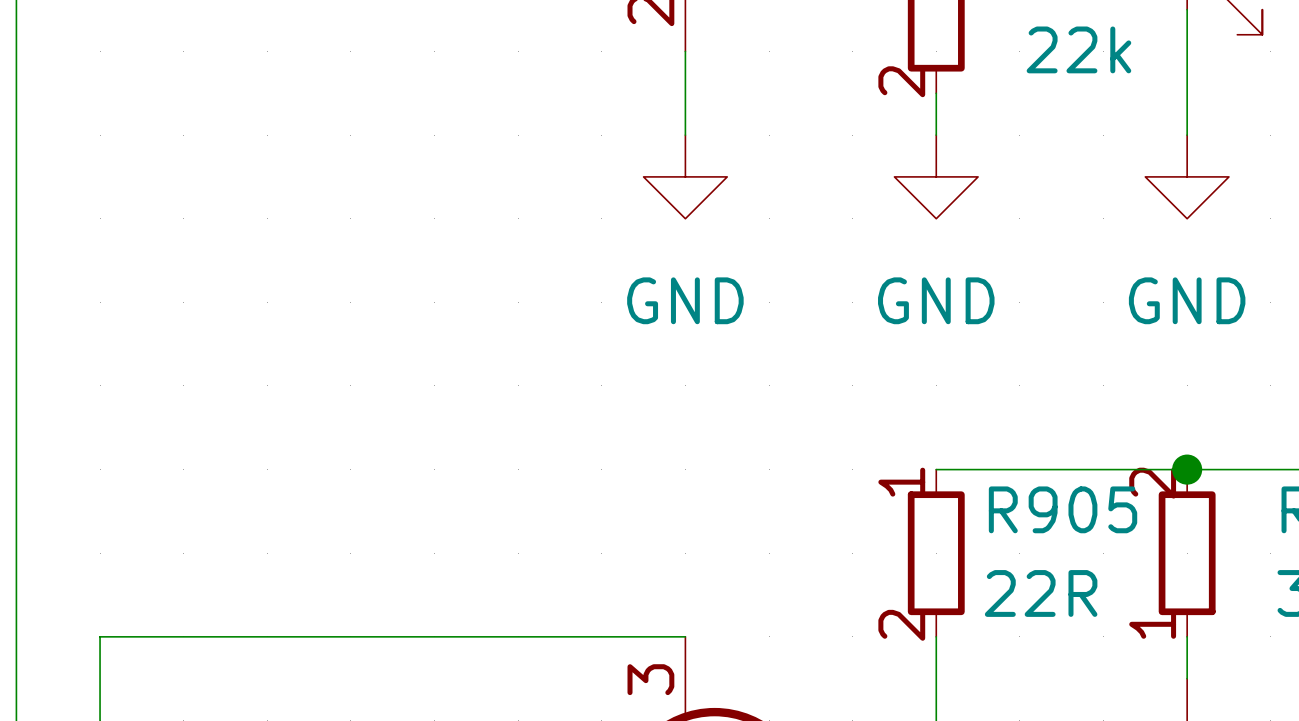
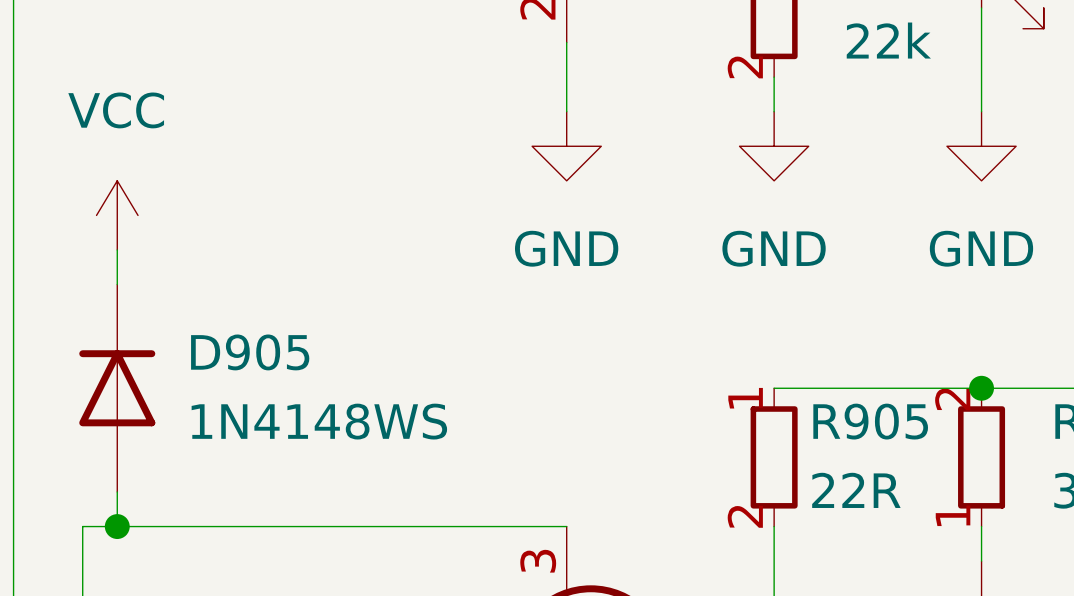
power symbol: none -> VCC (117, 215)
wire: none -> (117, 249) (117, 284)
D905: none -> 1N4148WS (117, 388)
wire: none -> (117, 491) (117, 526)
junction: none -> (117, 526)

